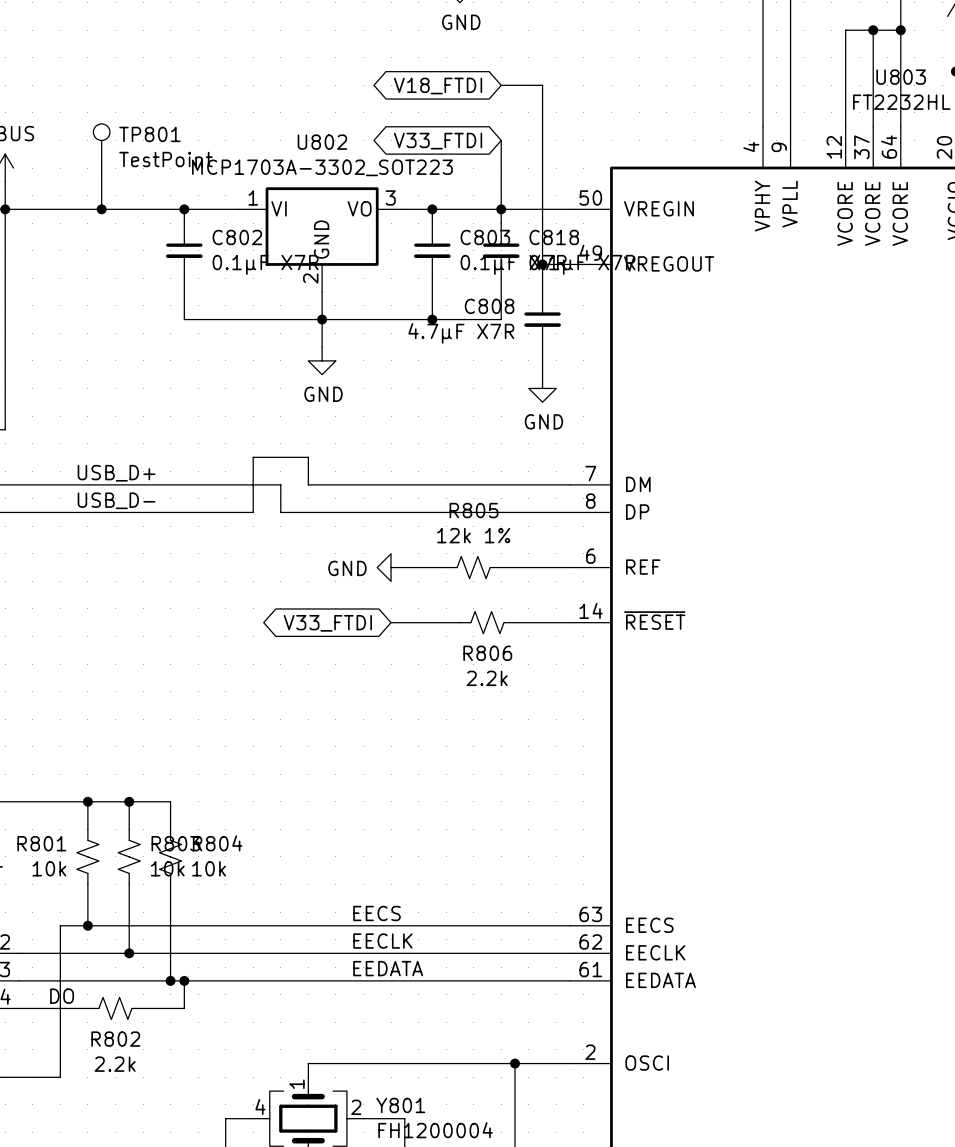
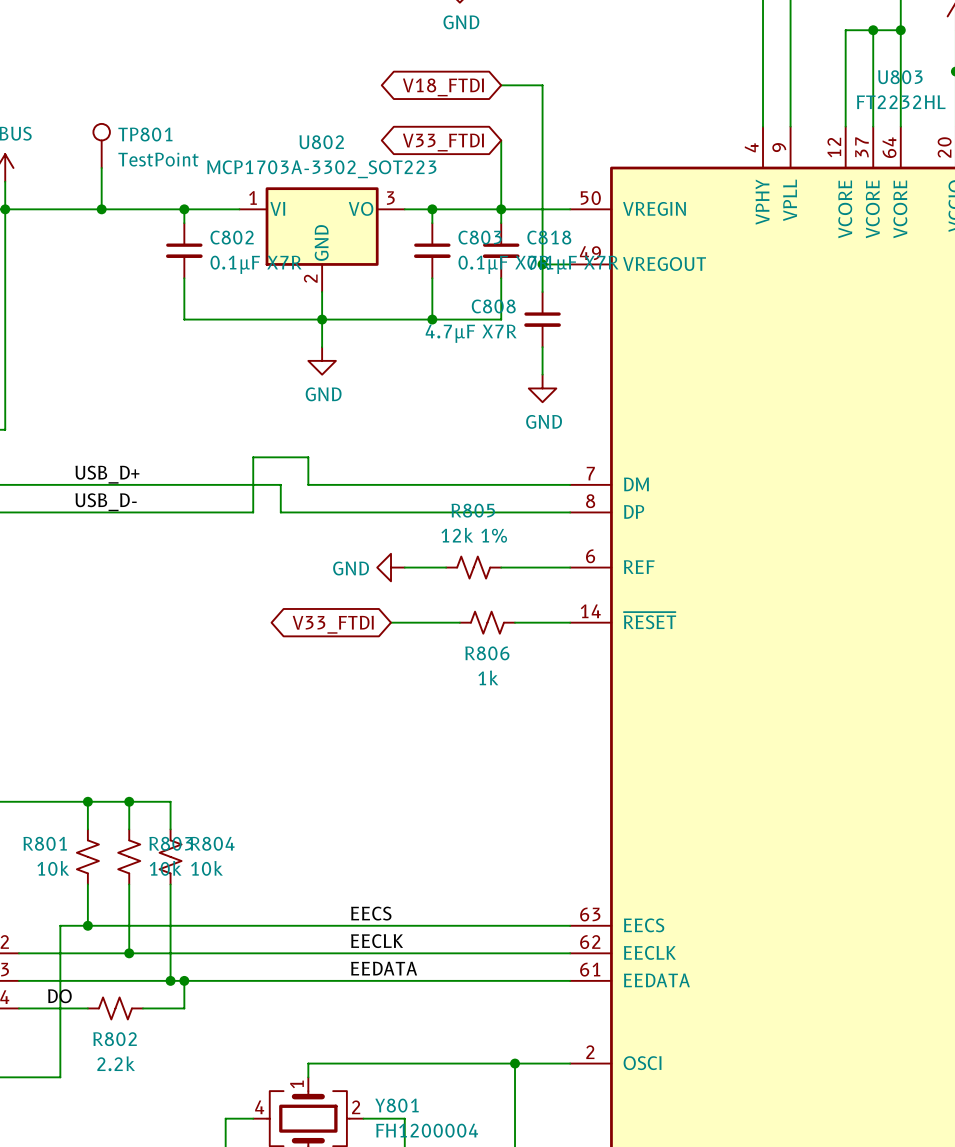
R806 value: 2.2k (487, 678) -> 1k (488, 677)

